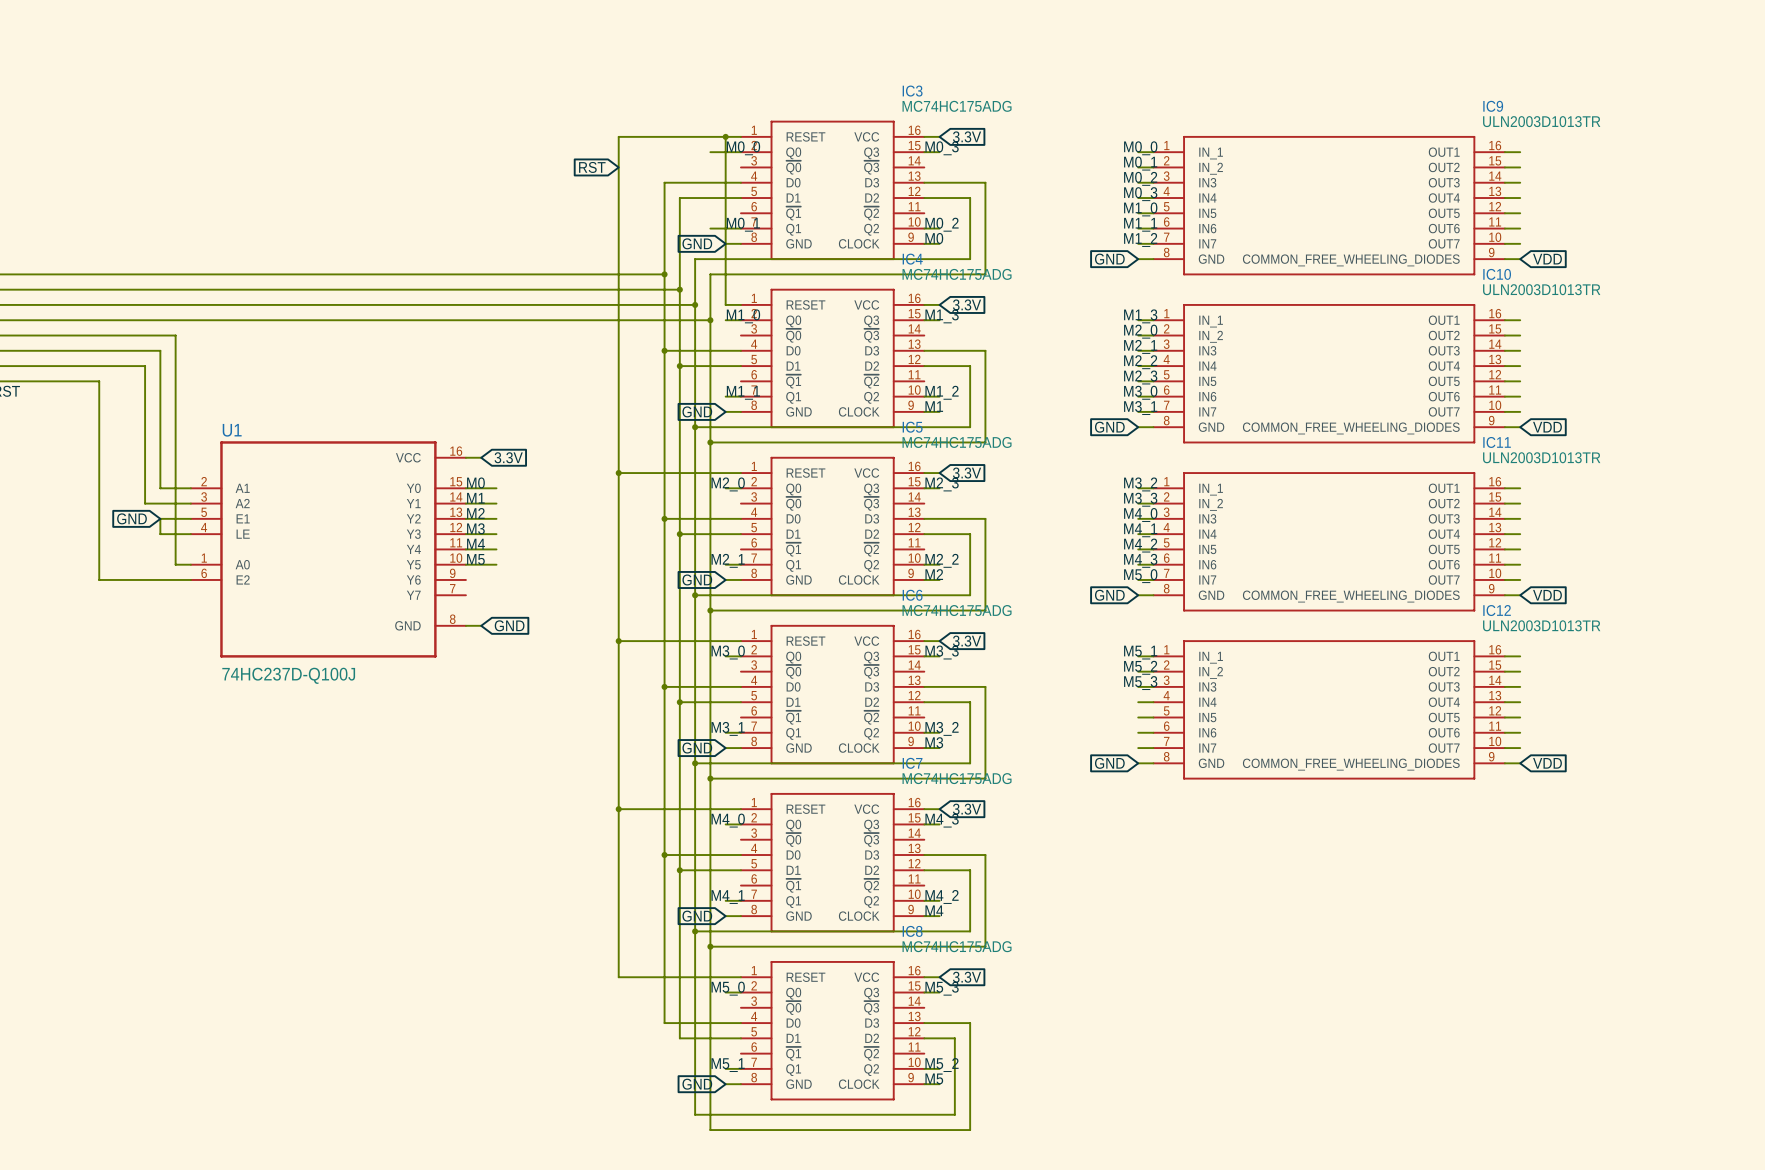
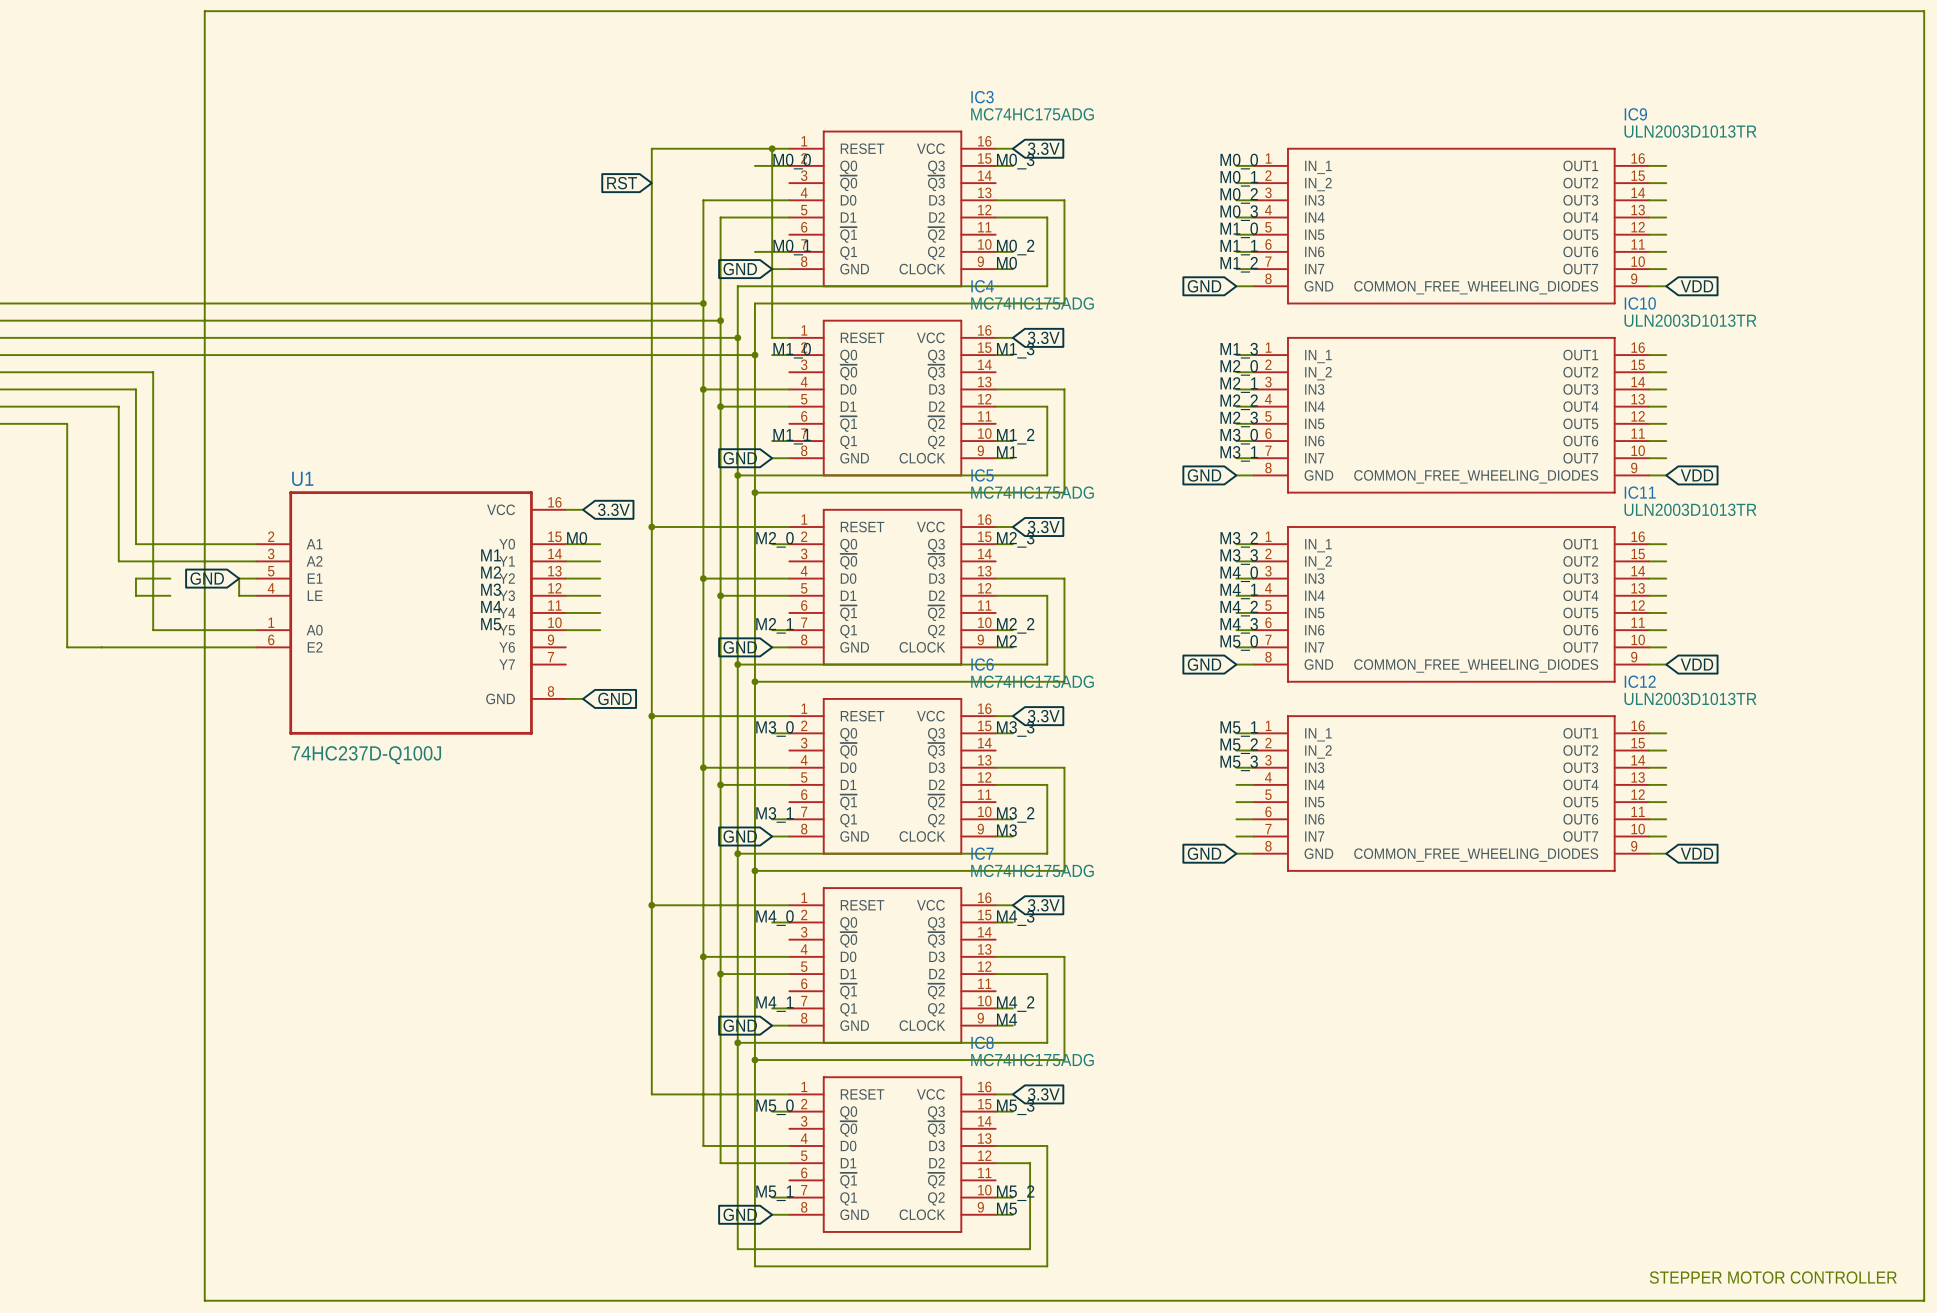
wire: none -> (204, 11) (204, 1300) (1924, 1300) (1924, 11) (204, 11)
wire: (465, 457) (481, 457) -> (565, 509) (583, 509)
global label position: 3.3V (508, 457) -> 3.3V (613, 509)
label position: M0 (475, 482) -> M0 (577, 538)
wire: none -> (170, 544) (256, 544)
wire: (465, 488) (496, 488) -> (565, 544) (600, 544)
wire: none -> (170, 561) (256, 561)
wire: (465, 503) (496, 503) -> (565, 561) (600, 561)
global label position: GND (131, 518) -> GND (207, 578)
wire: none -> (256, 578) (239, 578) (239, 595) (256, 595)
wire: (465, 518) (496, 518) -> (565, 578) (600, 578)
wire: (465, 534) (496, 534) -> (565, 595) (600, 595)
U1 position: (328, 549) -> (411, 612)
wire: (465, 549) (496, 549) -> (565, 612) (600, 612)
wire: none -> (170, 630) (256, 630)
wire: (465, 564) (496, 564) -> (565, 630) (600, 630)
wire: none -> (170, 647) (256, 647)
wire: (465, 625) (481, 625) -> (565, 698) (583, 698)
global label position: GND (509, 625) -> GND (614, 698)
text: none -> STEPPER MOTOR CONTROLLER (1773, 1277)

